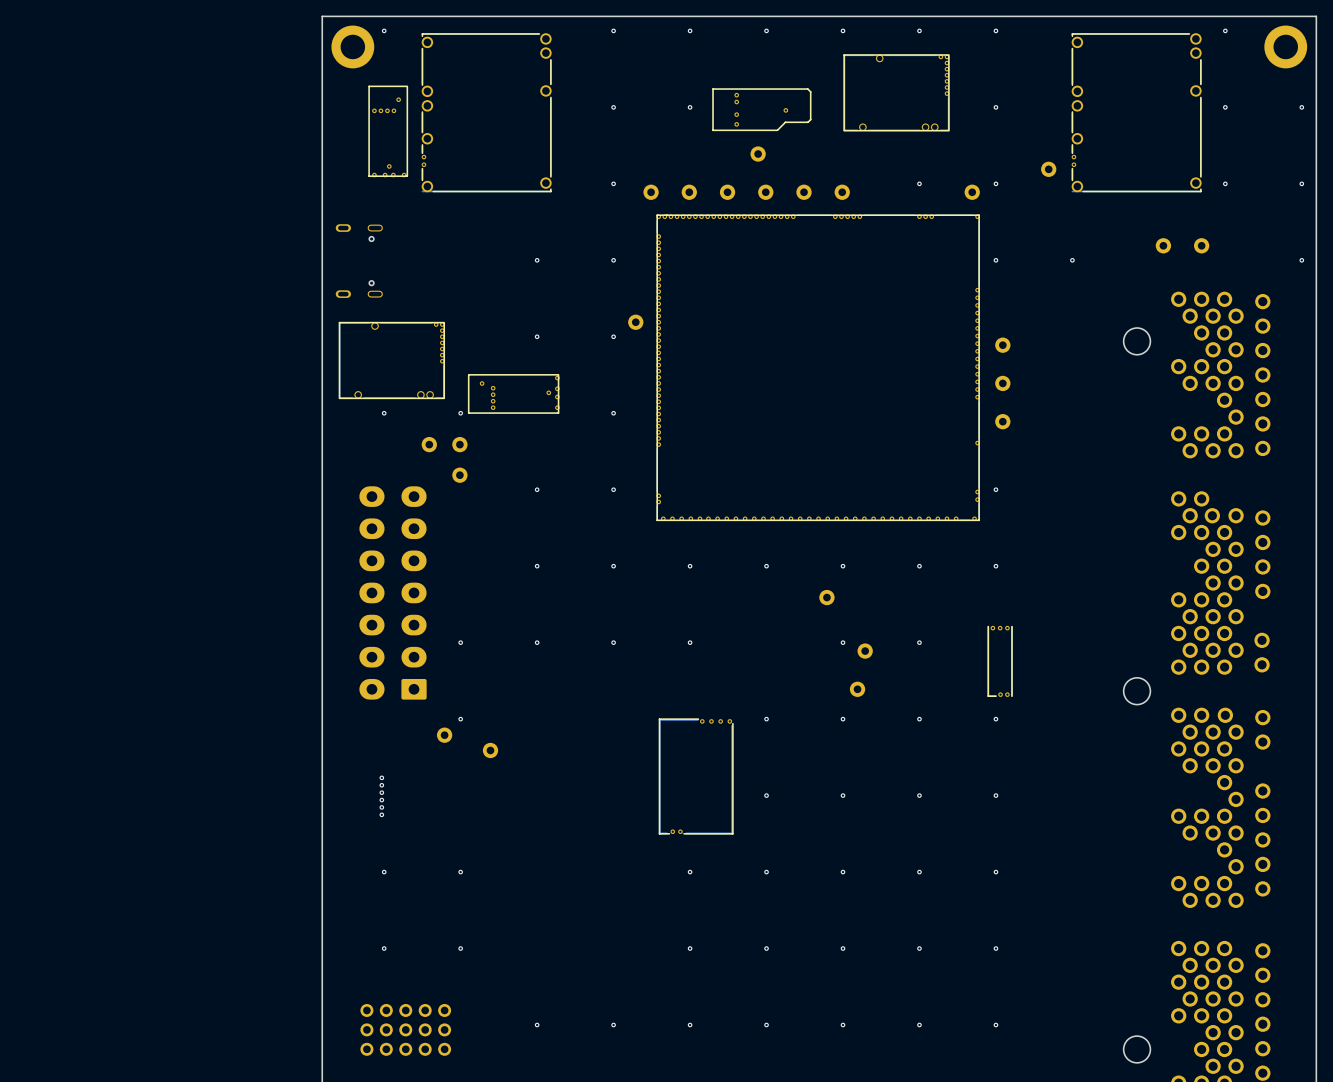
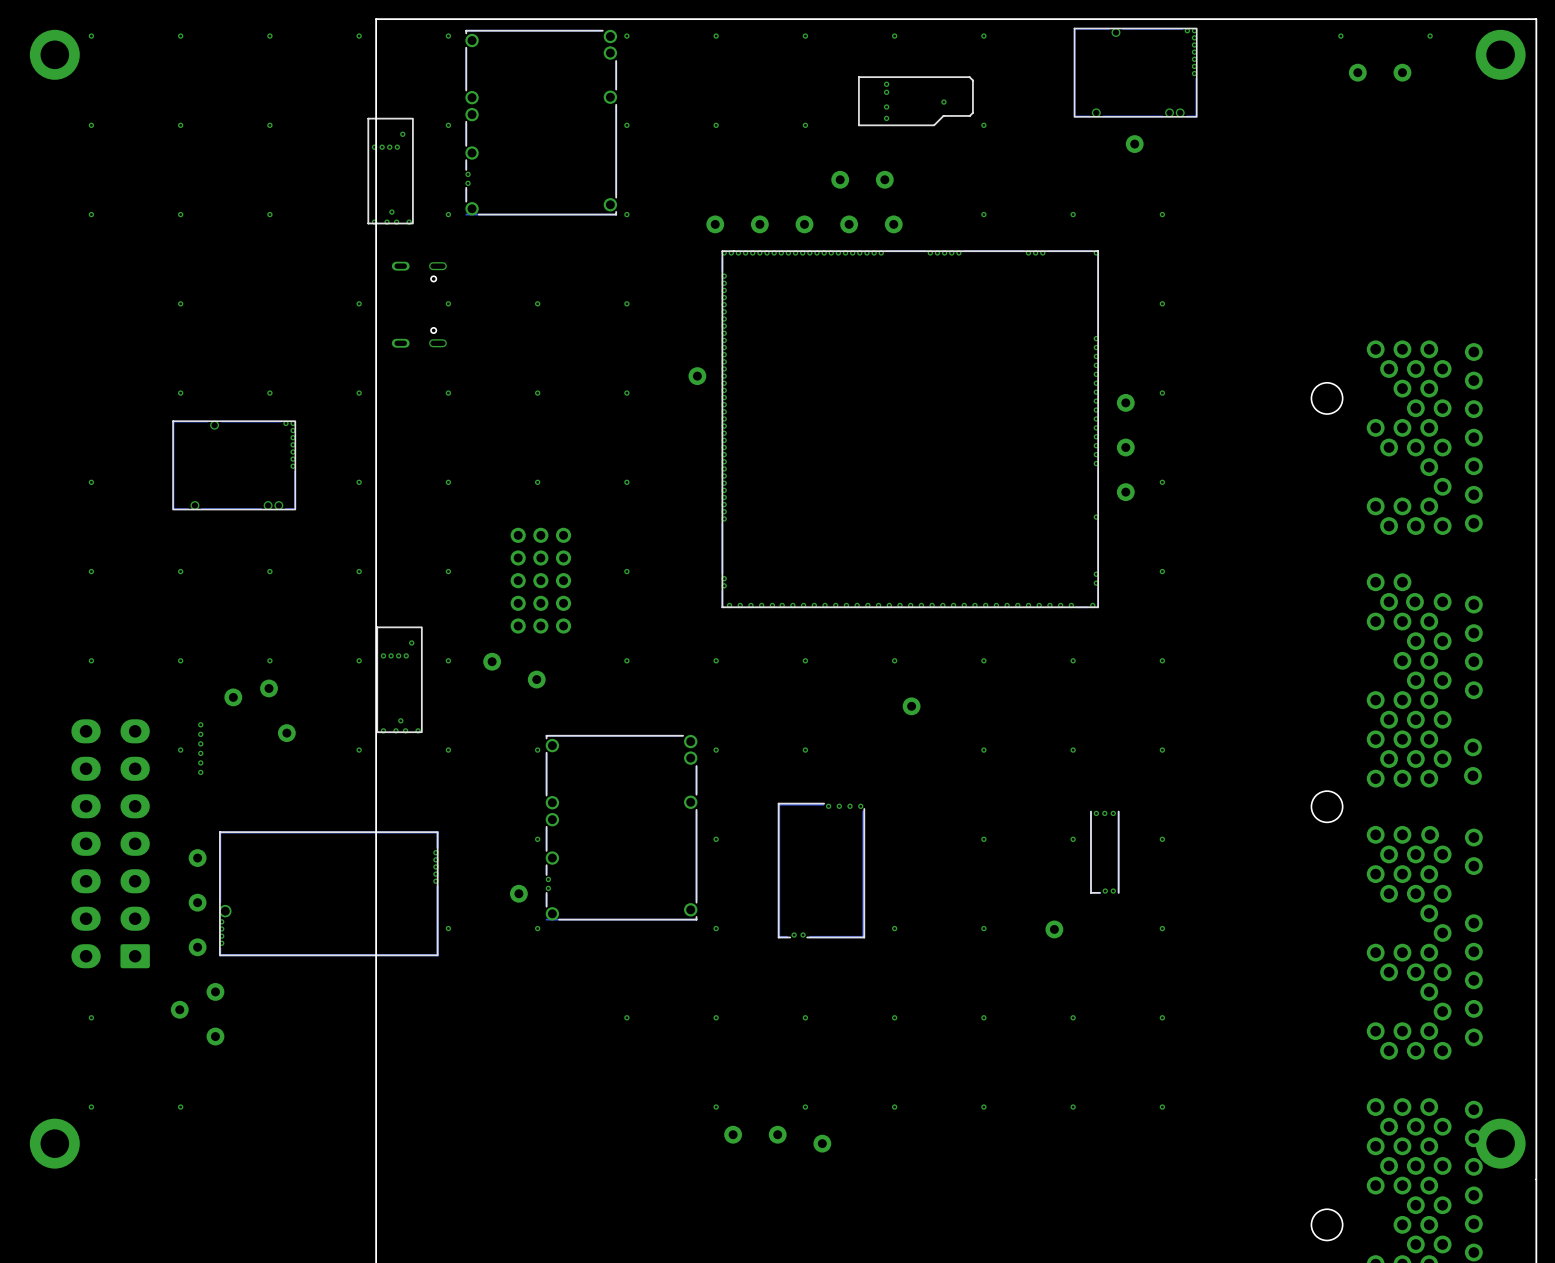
via: none -> (91, 36)
via: none -> (180, 36)
via: none -> (269, 36)
via: none -> (359, 36)
via: none -> (626, 36)
via: (919, 30) -> none
via: (995, 30) -> none
via: none -> (1340, 36)
part: none -> (54, 54)
part: (352, 46) -> none
part: none -> (1357, 72)
part: none -> (1402, 72)
part position: (896, 92) -> (1135, 72)
via: none -> (91, 125)
via: none -> (180, 125)
via: none -> (269, 125)
via: none -> (448, 125)
via: none -> (626, 125)
via: none -> (983, 125)
via: (995, 107) -> none
via: (1225, 107) -> none
via: (1301, 107) -> none
part position: (761, 109) -> (915, 101)
part position: (486, 112) -> (541, 122)
part: (1136, 112) -> none
part: none -> (1134, 144)
part position: (388, 131) -> (390, 171)
part: none -> (840, 179)
part: (1048, 169) -> none
via: none -> (91, 214)
via: none -> (180, 214)
via: none -> (269, 214)
via: none -> (448, 214)
via: none -> (626, 214)
via: (613, 183) -> none
via: none -> (983, 214)
via: (1225, 183) -> none
via: (1301, 183) -> none
part: none -> (715, 224)
part: (804, 192) -> none
part: (842, 192) -> none
part: (972, 192) -> none
part: (1163, 245) -> none
part: (1201, 245) -> none
via: none -> (180, 303)
via: none -> (359, 303)
via: none -> (448, 303)
via: none -> (537, 303)
via: (613, 260) -> none
via: (1072, 260) -> none
via: (1301, 260) -> none
part position: (635, 322) -> (697, 376)
via: none -> (180, 393)
via: none -> (269, 393)
via: none -> (359, 393)
via: none -> (448, 393)
via: none -> (537, 393)
via: (613, 336) -> none
via: none -> (1162, 393)
part: none -> (1125, 402)
part: (1002, 345) -> none
part: (391, 360) -> none
part position: (818, 367) -> (910, 429)
part: none -> (1125, 447)
part: (1002, 383) -> none
part: (513, 393) -> none
part: none -> (234, 465)
via: none -> (91, 482)
via: none -> (359, 482)
via: none -> (626, 482)
via: (613, 413) -> none
via: none -> (1162, 482)
part: none -> (1125, 492)
part: (1002, 421) -> none
part: (429, 444) -> none
part: (459, 444) -> none
part: (459, 475) -> none
via: none -> (91, 571)
via: none -> (180, 571)
via: none -> (269, 571)
via: none -> (359, 571)
via: none -> (448, 571)
via: (613, 489) -> none
part: none -> (540, 580)
via: none -> (91, 660)
via: none -> (180, 660)
via: none -> (269, 660)
via: none -> (359, 660)
via: none -> (448, 660)
part: none -> (492, 661)
part: none -> (399, 680)
part: none -> (536, 679)
part: none -> (269, 688)
part: (392, 592) -> none
part: none -> (233, 697)
part position: (826, 597) -> (911, 706)
via: none -> (200, 724)
part: none -> (286, 733)
via: none -> (200, 734)
via: none -> (200, 743)
via: none -> (180, 750)
via: none -> (359, 750)
via: none -> (448, 750)
via: (537, 642) -> none
via: none -> (1162, 750)
via: none -> (200, 753)
part: (865, 651) -> none
via: none -> (200, 762)
via: none -> (200, 772)
part position: (1000, 661) -> (1104, 852)
part: (857, 689) -> none
part: none -> (621, 827)
via: none -> (716, 839)
via: (766, 719) -> none
part: none -> (110, 843)
part: none -> (197, 858)
part: (444, 735) -> none
part: (490, 750) -> none
part: none -> (328, 893)
part: none -> (518, 893)
part: none -> (197, 902)
part position: (696, 776) -> (821, 870)
via: (381, 777) -> none
via: (381, 785) -> none
via: (381, 792) -> none
via: none -> (448, 928)
via: none -> (537, 928)
via: none -> (716, 928)
via: (919, 795) -> none
part: none -> (1054, 929)
via: (381, 800) -> none
via: (381, 807) -> none
part: none -> (197, 947)
via: (381, 814) -> none
part: none -> (215, 991)
part: none -> (179, 1009)
via: none -> (91, 1017)
via: (384, 872) -> none
via: (460, 872) -> none
via: none -> (626, 1017)
via: none -> (716, 1017)
part: none -> (215, 1036)
via: none -> (91, 1107)
via: none -> (180, 1107)
via: (384, 948) -> none
via: (460, 948) -> none
via: none -> (716, 1107)
part: none -> (733, 1134)
part: none -> (777, 1134)
part: none -> (54, 1143)
part: none -> (822, 1143)
part: none -> (1500, 1143)
via: (537, 1025) -> none
via: (613, 1025) -> none
via: (690, 1025) -> none
via: (766, 1025) -> none
via: (843, 1025) -> none
via: (919, 1025) -> none
via: (995, 1025) -> none
part: (405, 1029) -> none

